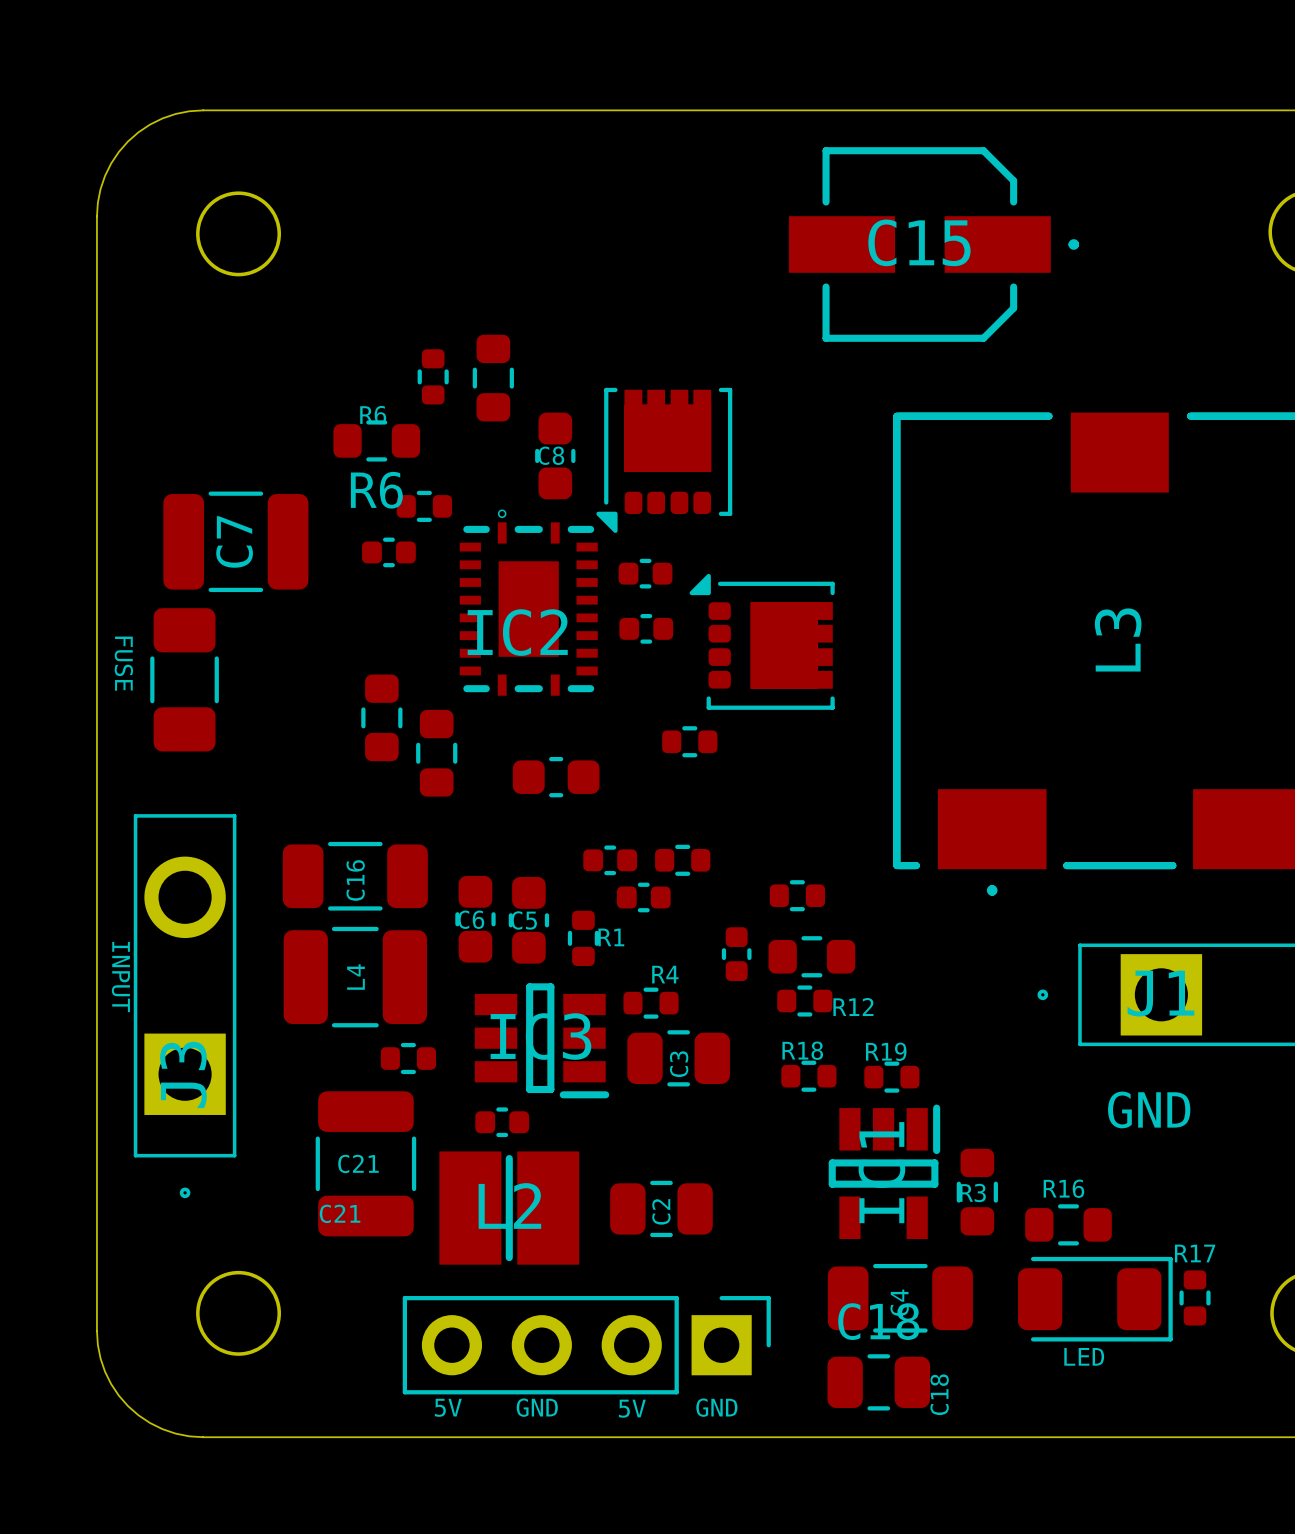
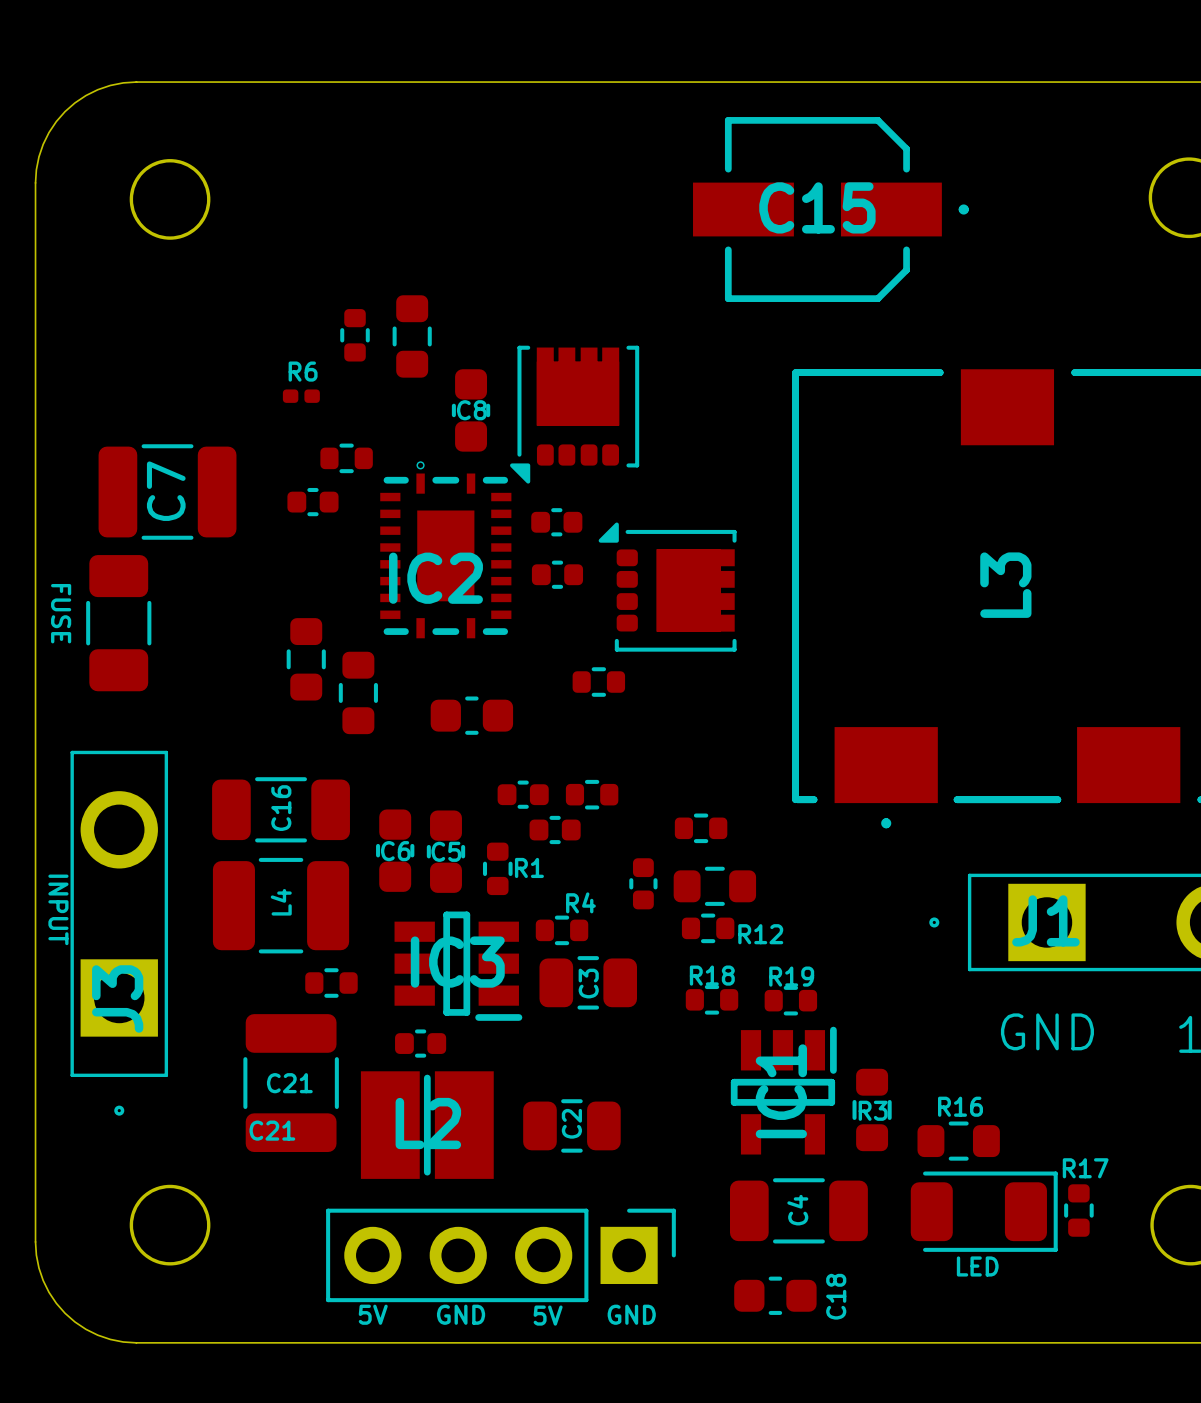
R6: (376, 440) -> none
part: none -> (301, 396)
C18: (878, 1382) -> none
part: none -> (775, 1295)

